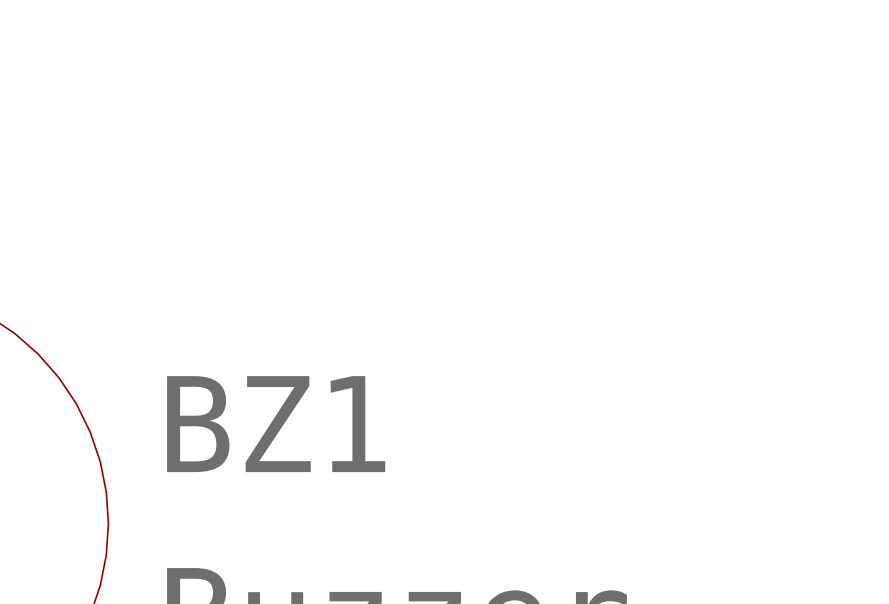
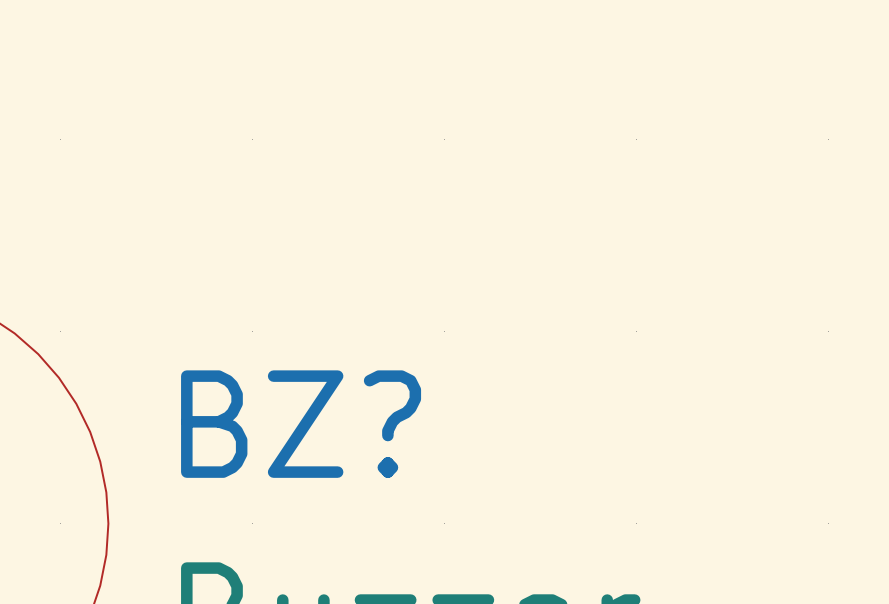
BZ1 name: BZ1 (276, 424) -> BZ? (301, 424)

